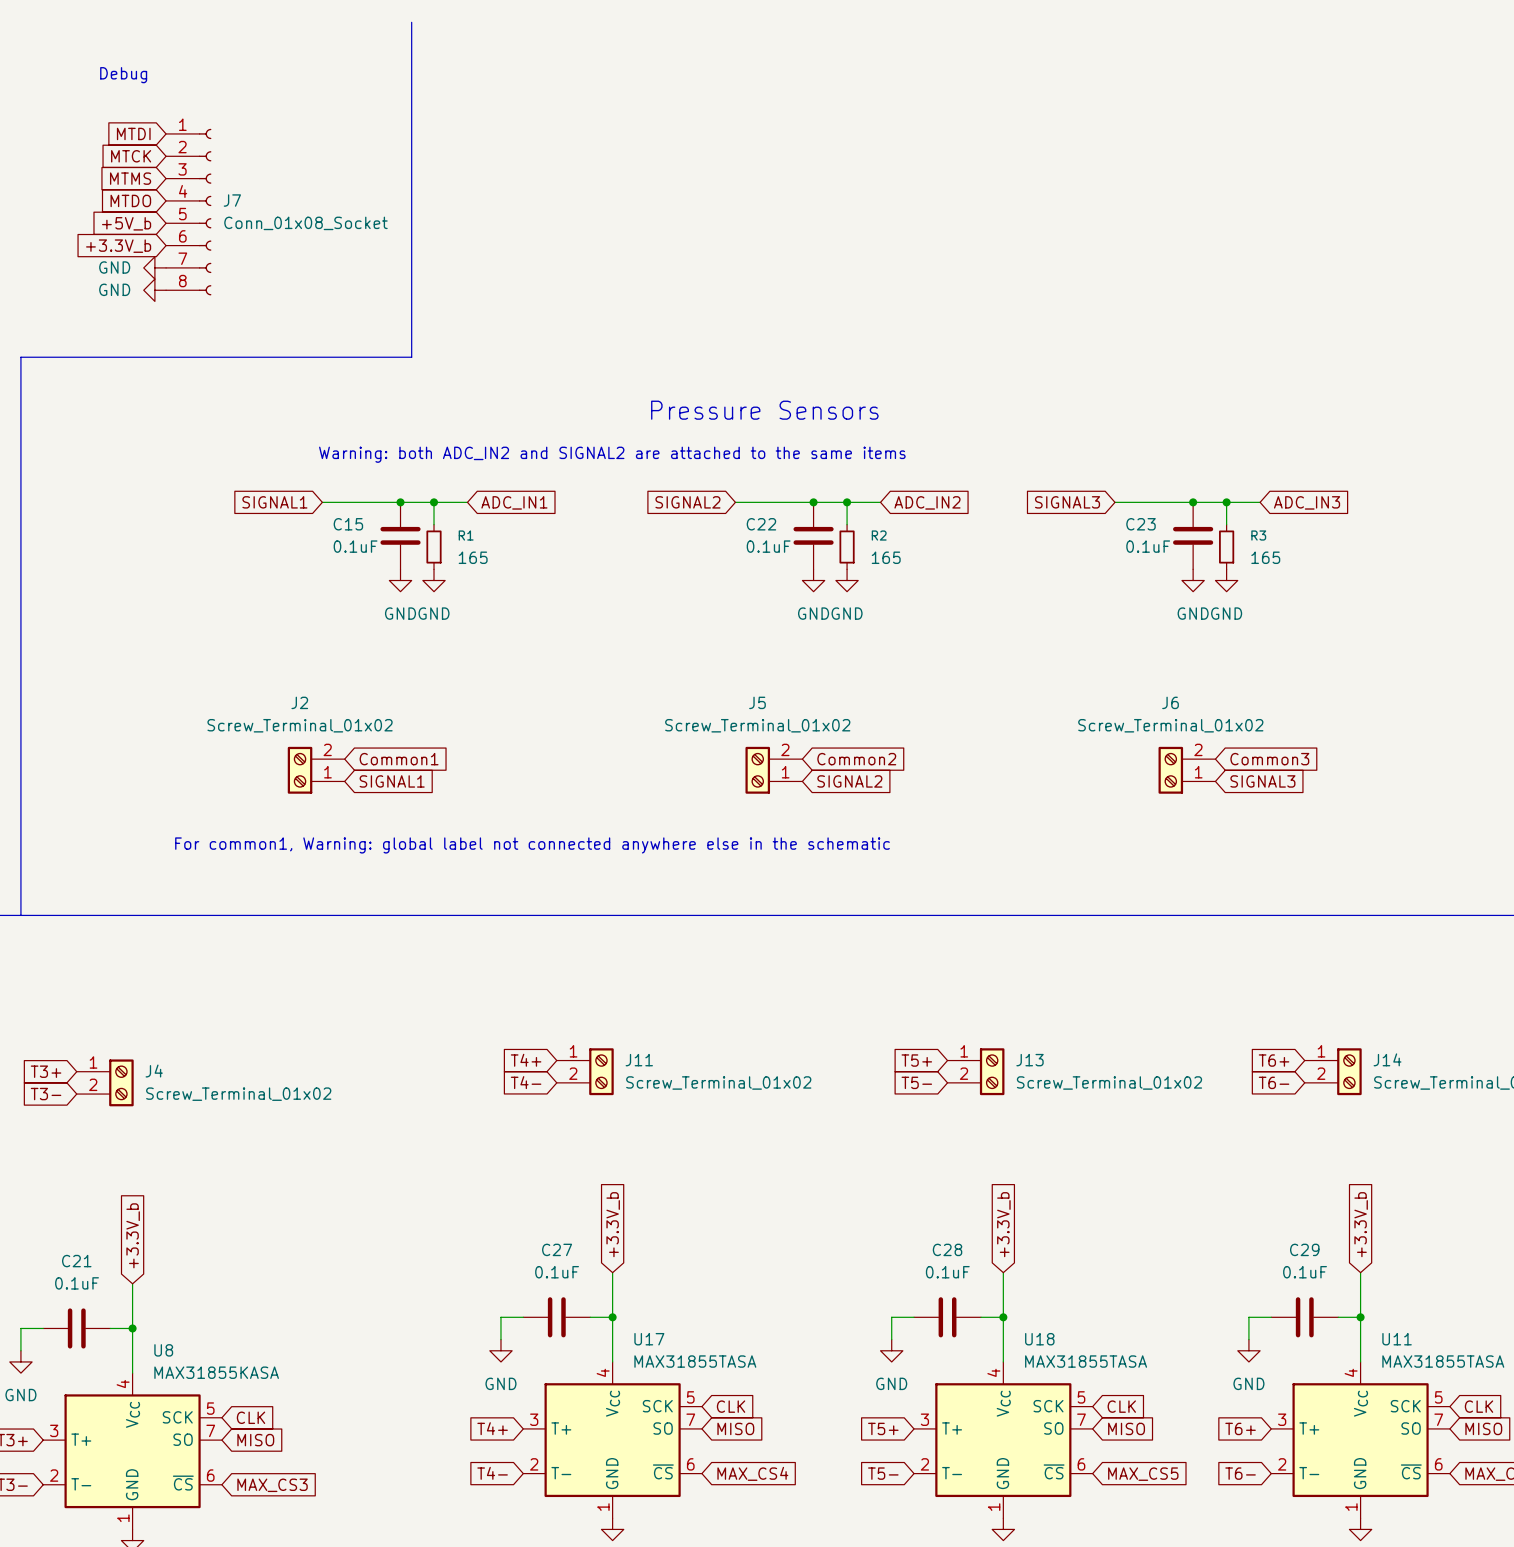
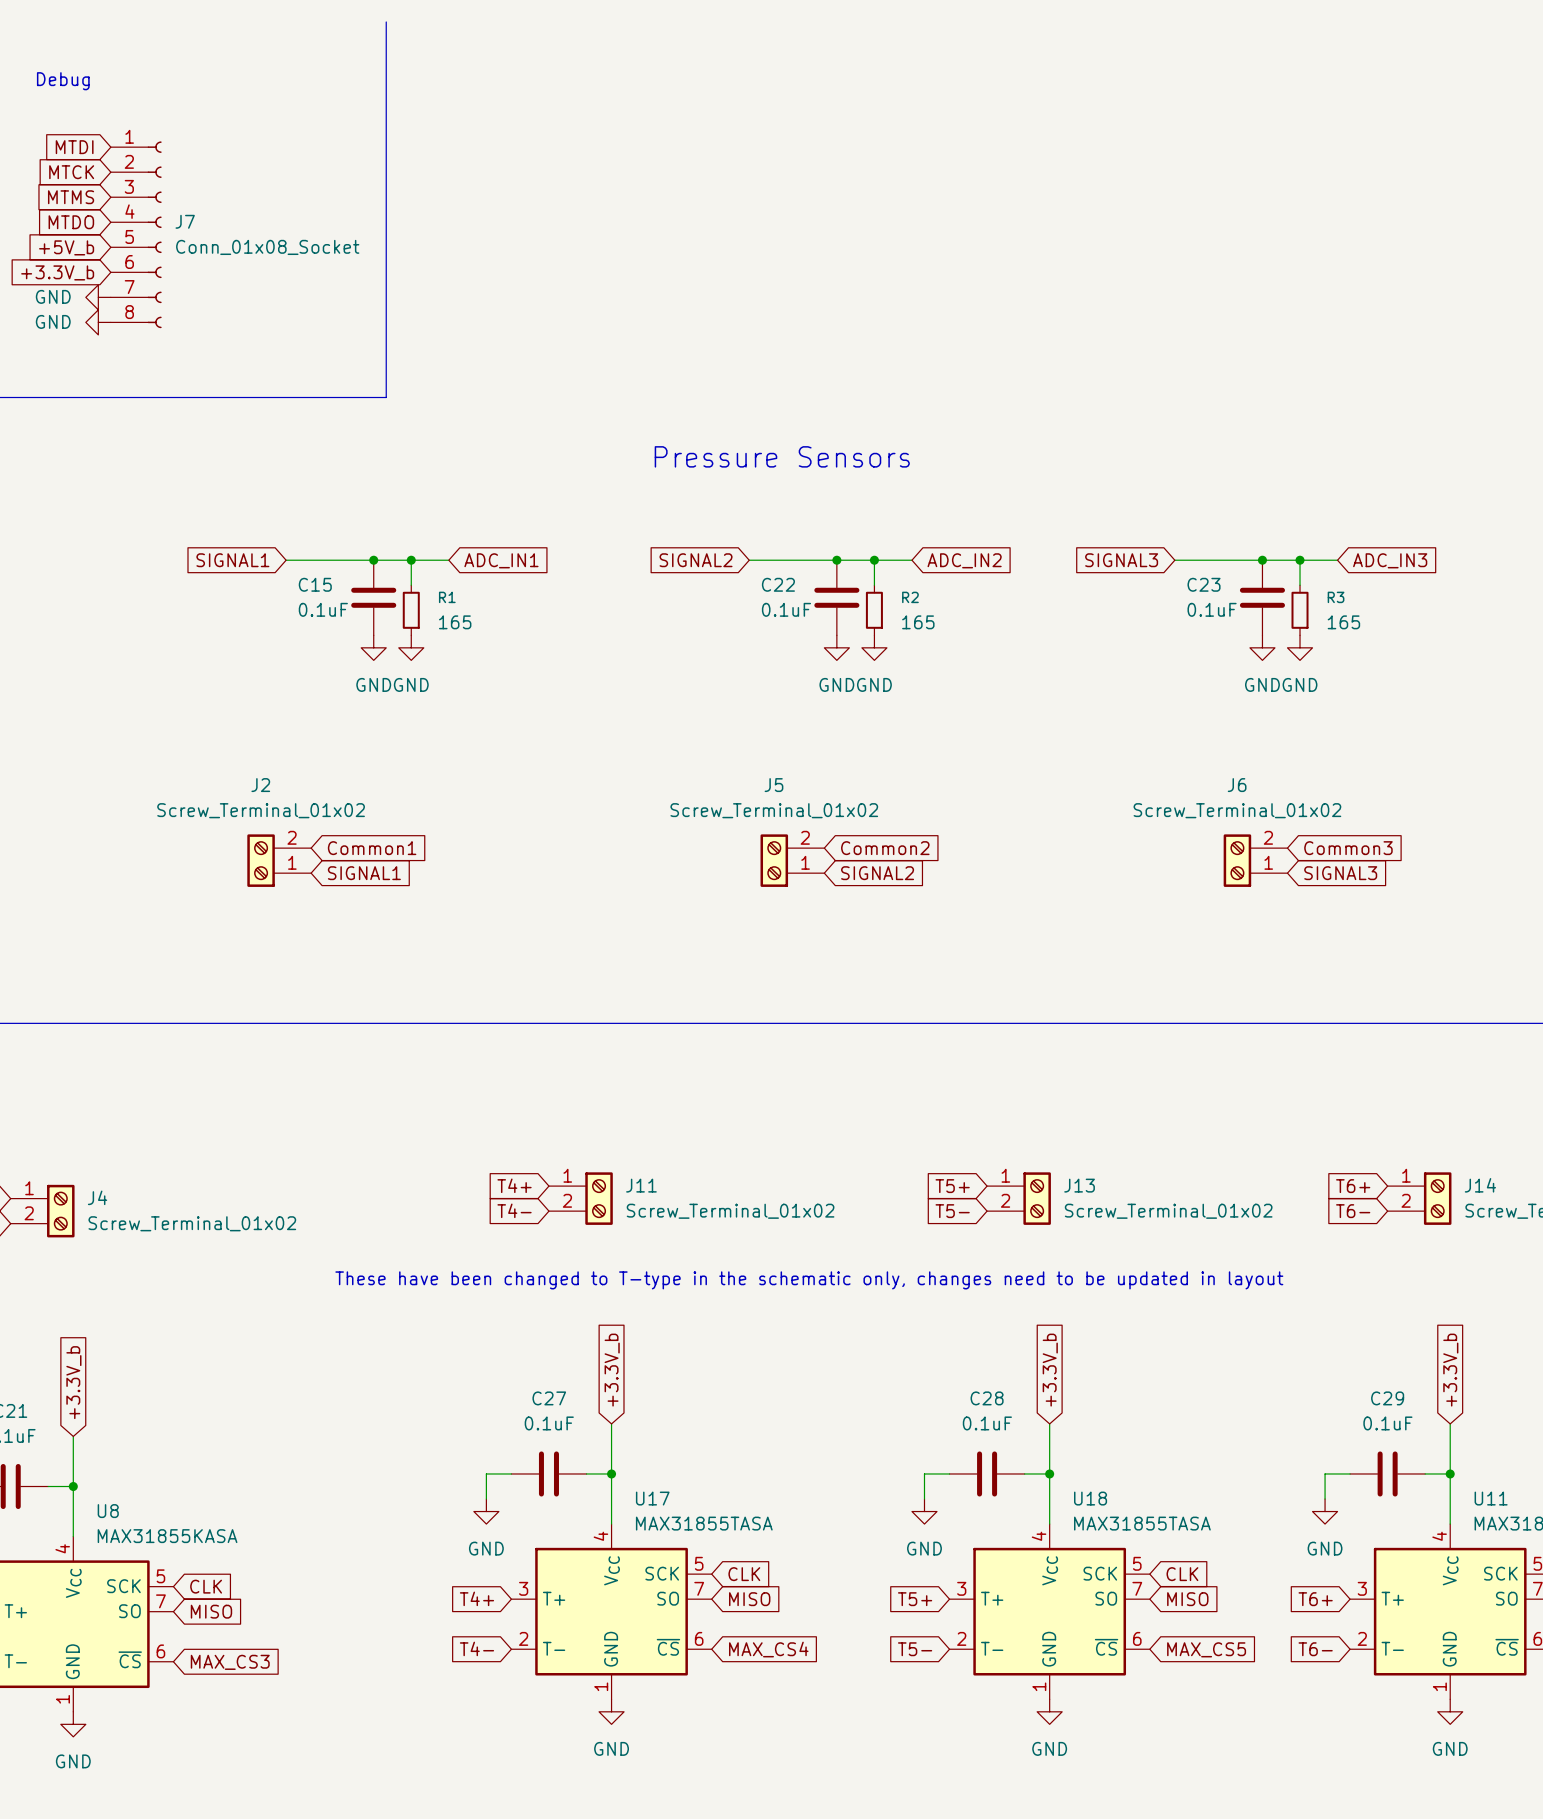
text: Warning: both ADC_IN2 and SIGNAL2 are attached to the same items (612, 454) -> none
text: For common1, Warning: global label not connected anywhere else in the schematic (532, 845) -> none
text: none -> These have been changed to T-type in the schematic only, changes need to be updated in layout (809, 1280)

